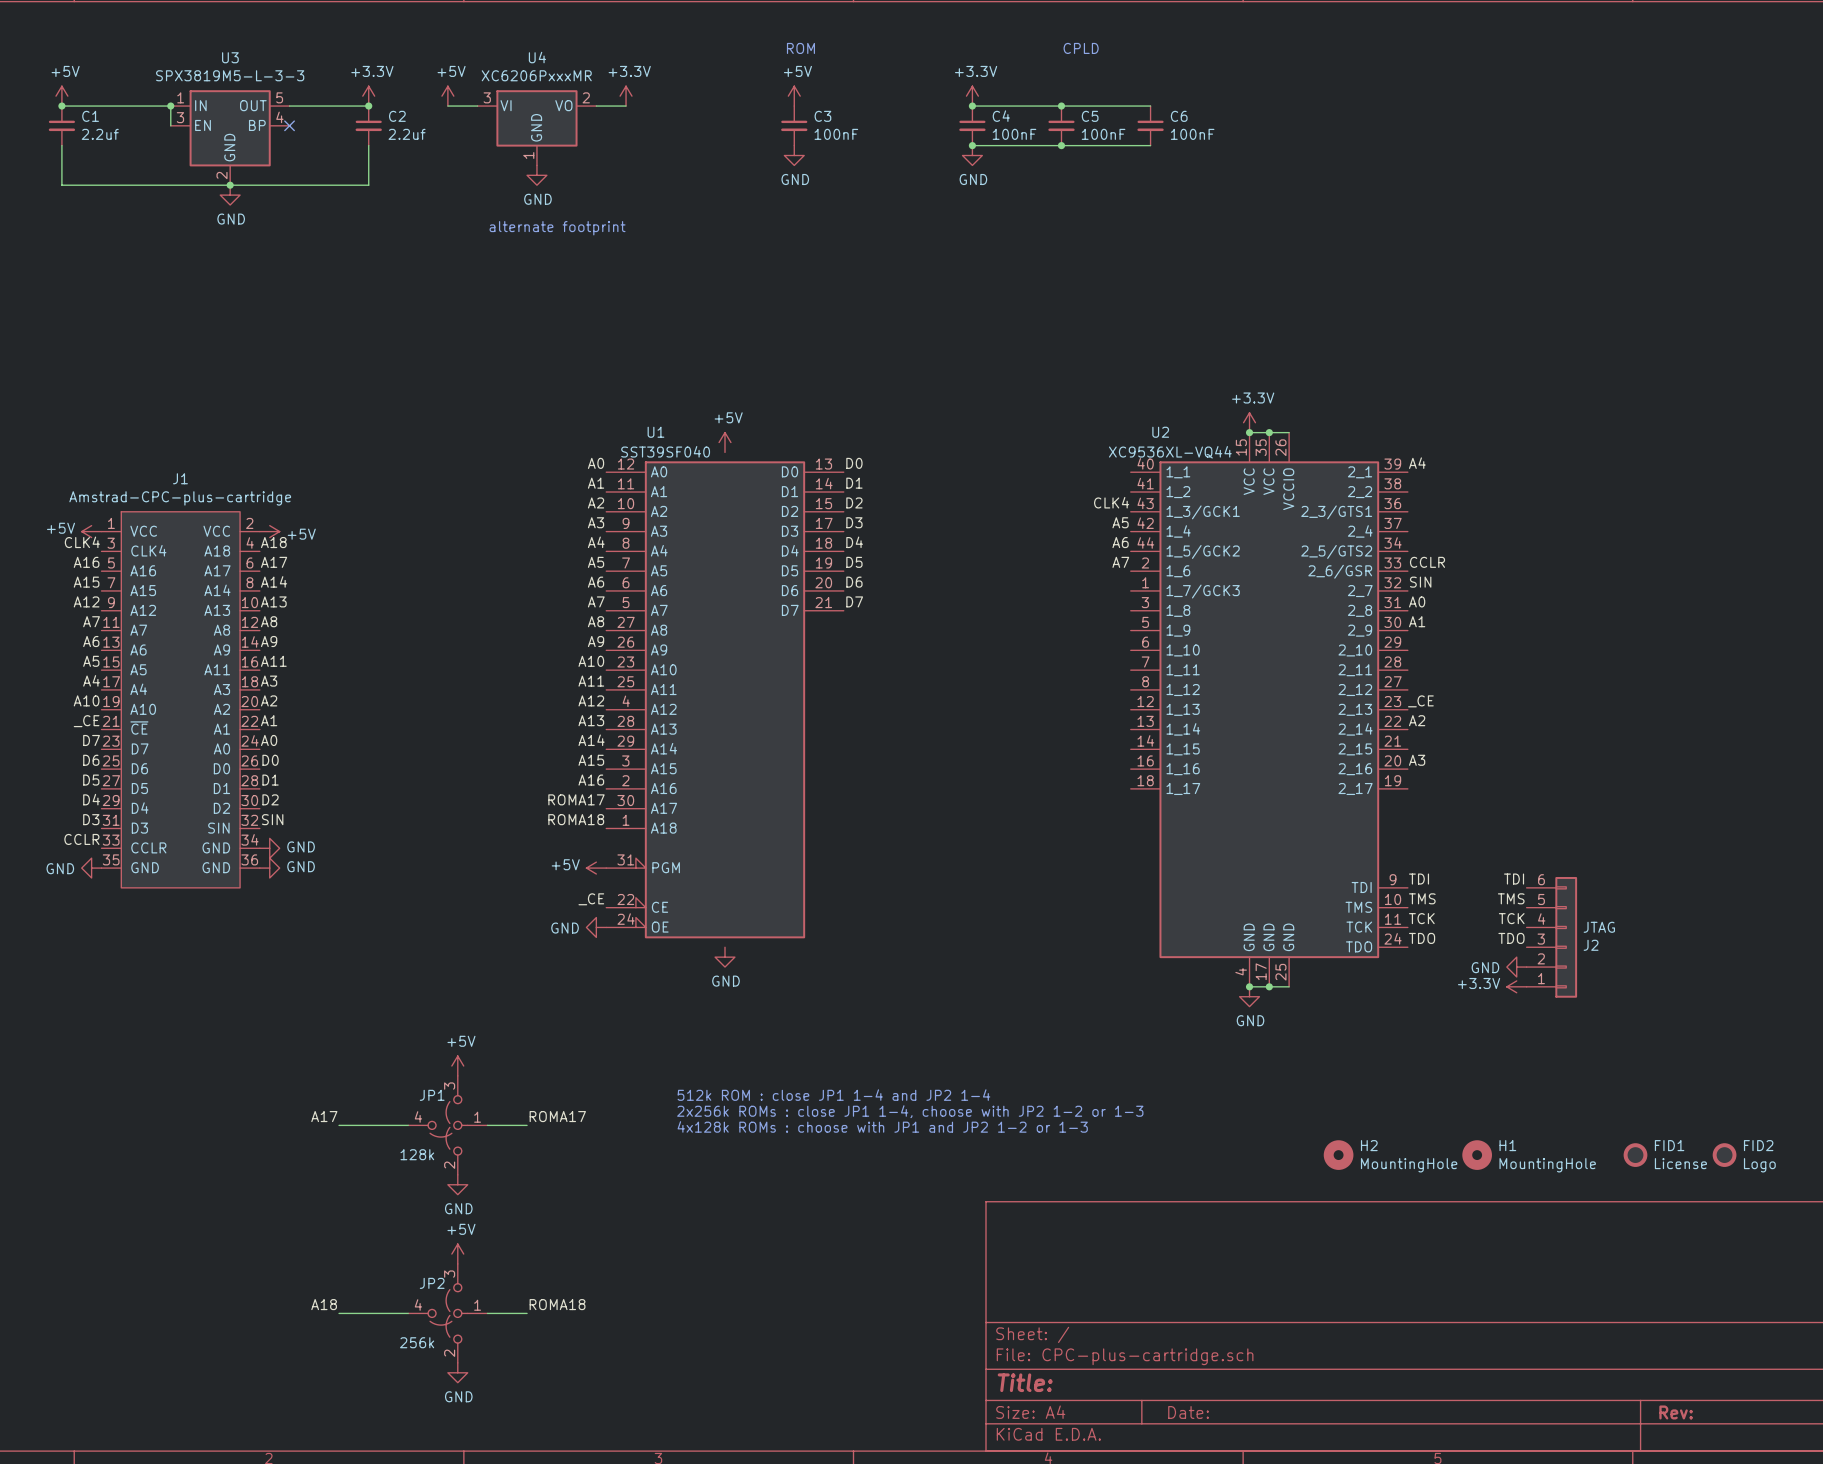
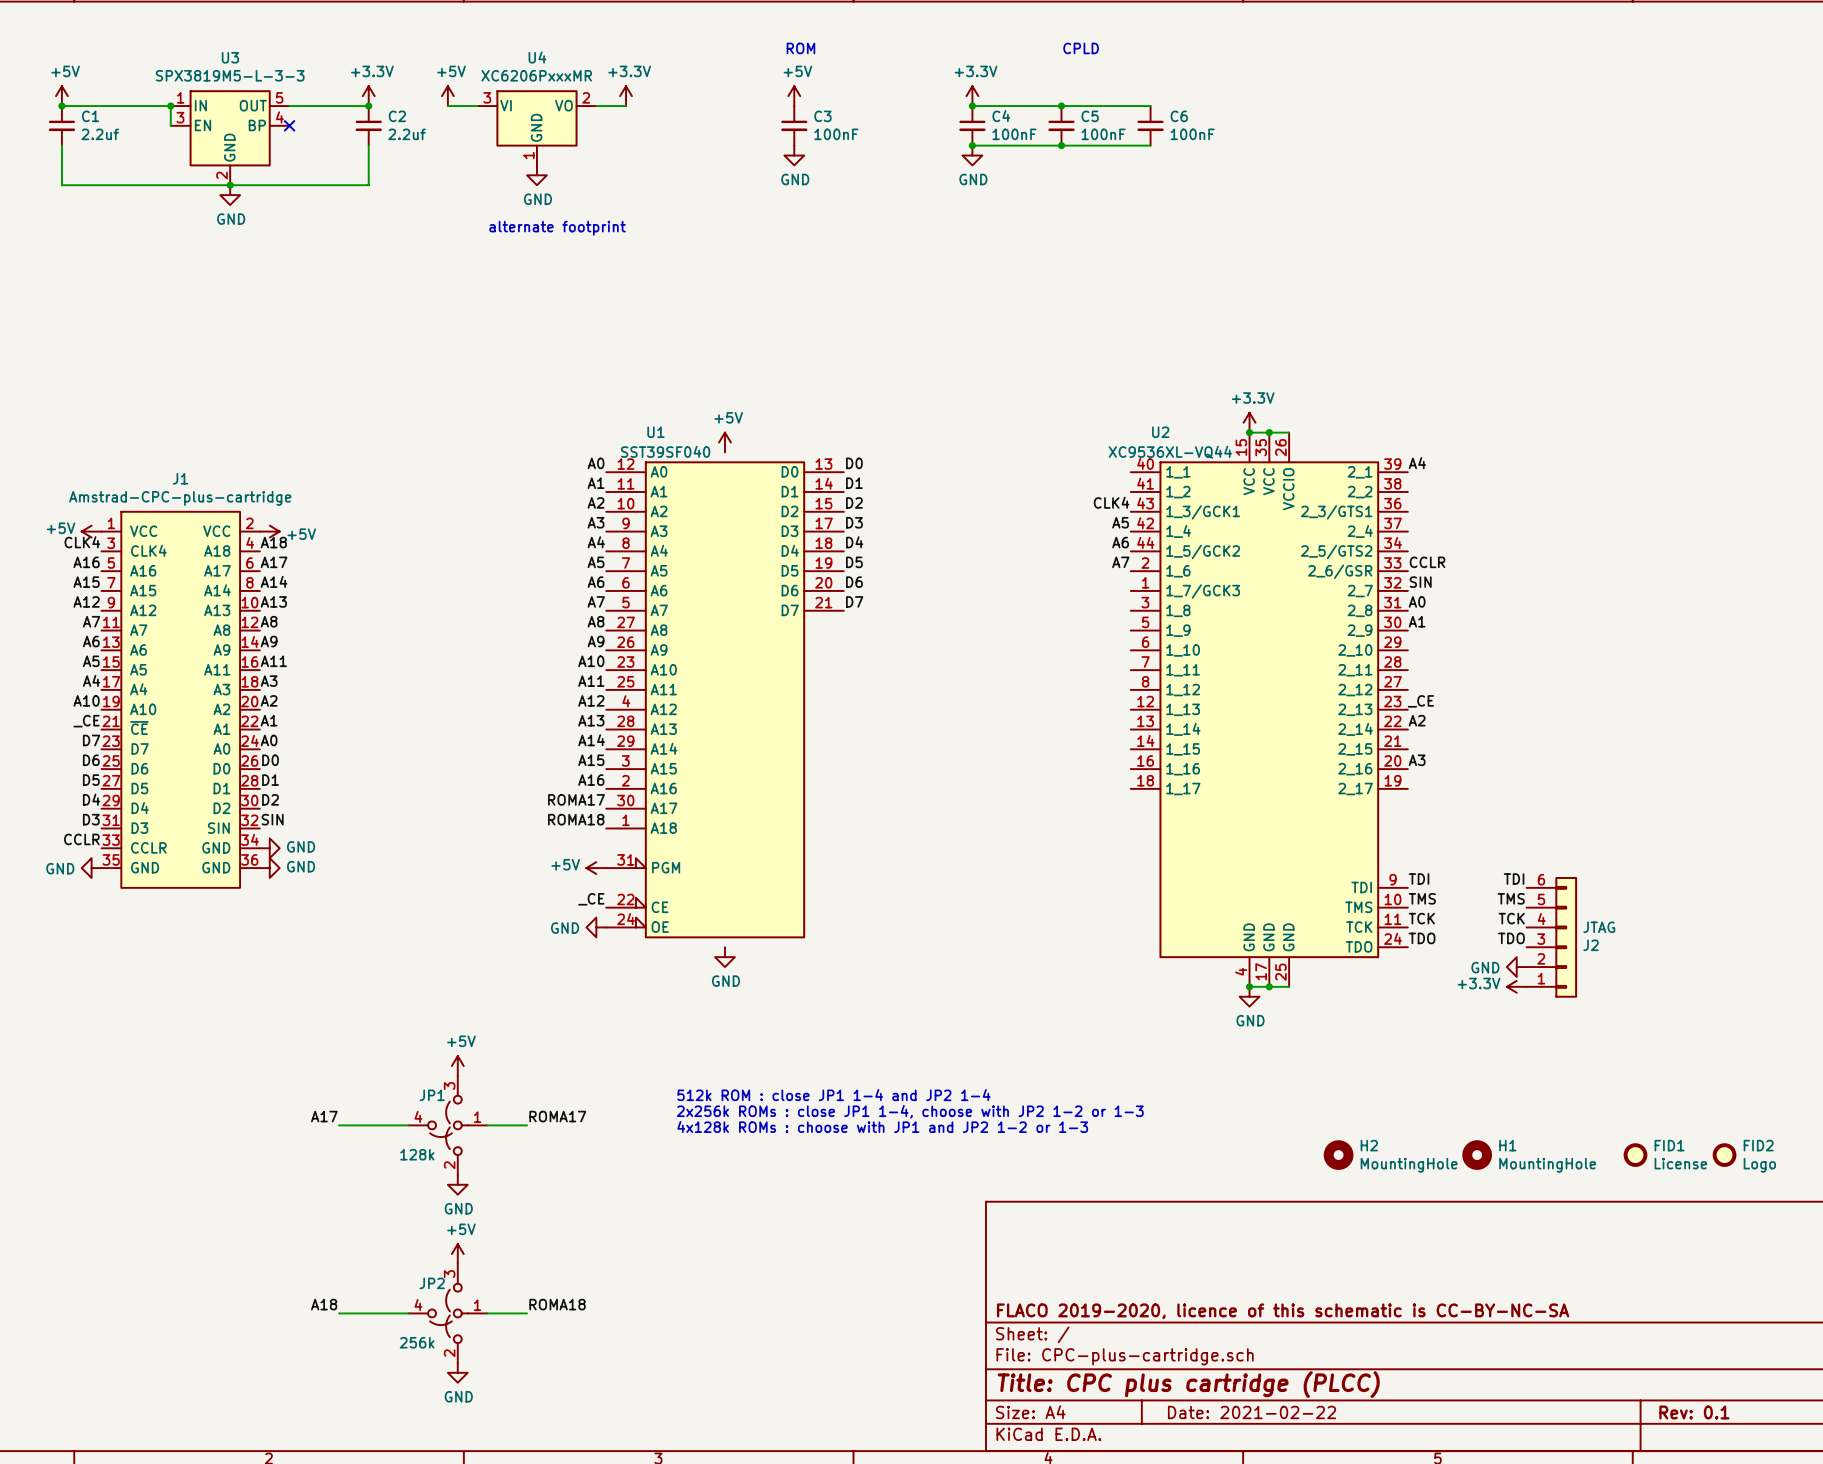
title block: none -> FLACO 2019-2020, licence of this schematic is CC-BY-NC-SA (1283, 1311)
title block: Title: (1025, 1382) -> Title: CPC plus cartridge (PLCC) (1188, 1384)
title block: Date: (1188, 1412) -> Date: 2021-02-22 (1252, 1412)
title block: Rev: (1676, 1412) -> Rev: 0.1 (1694, 1412)

